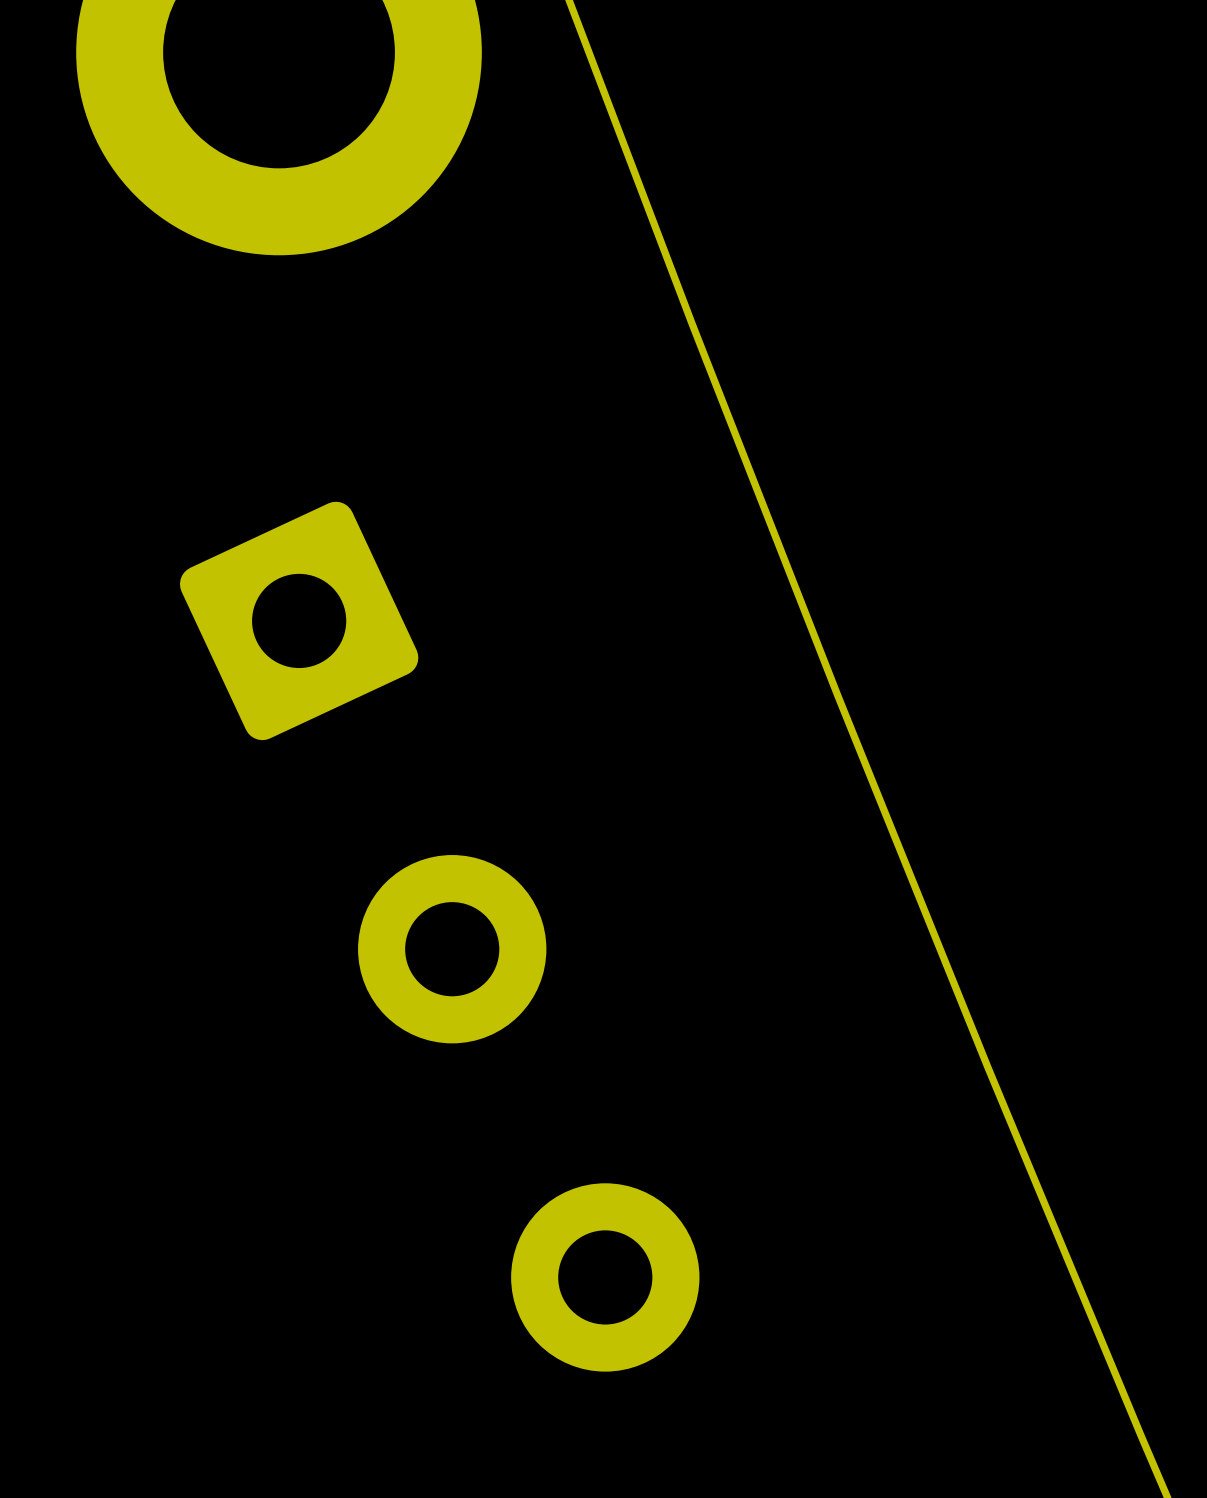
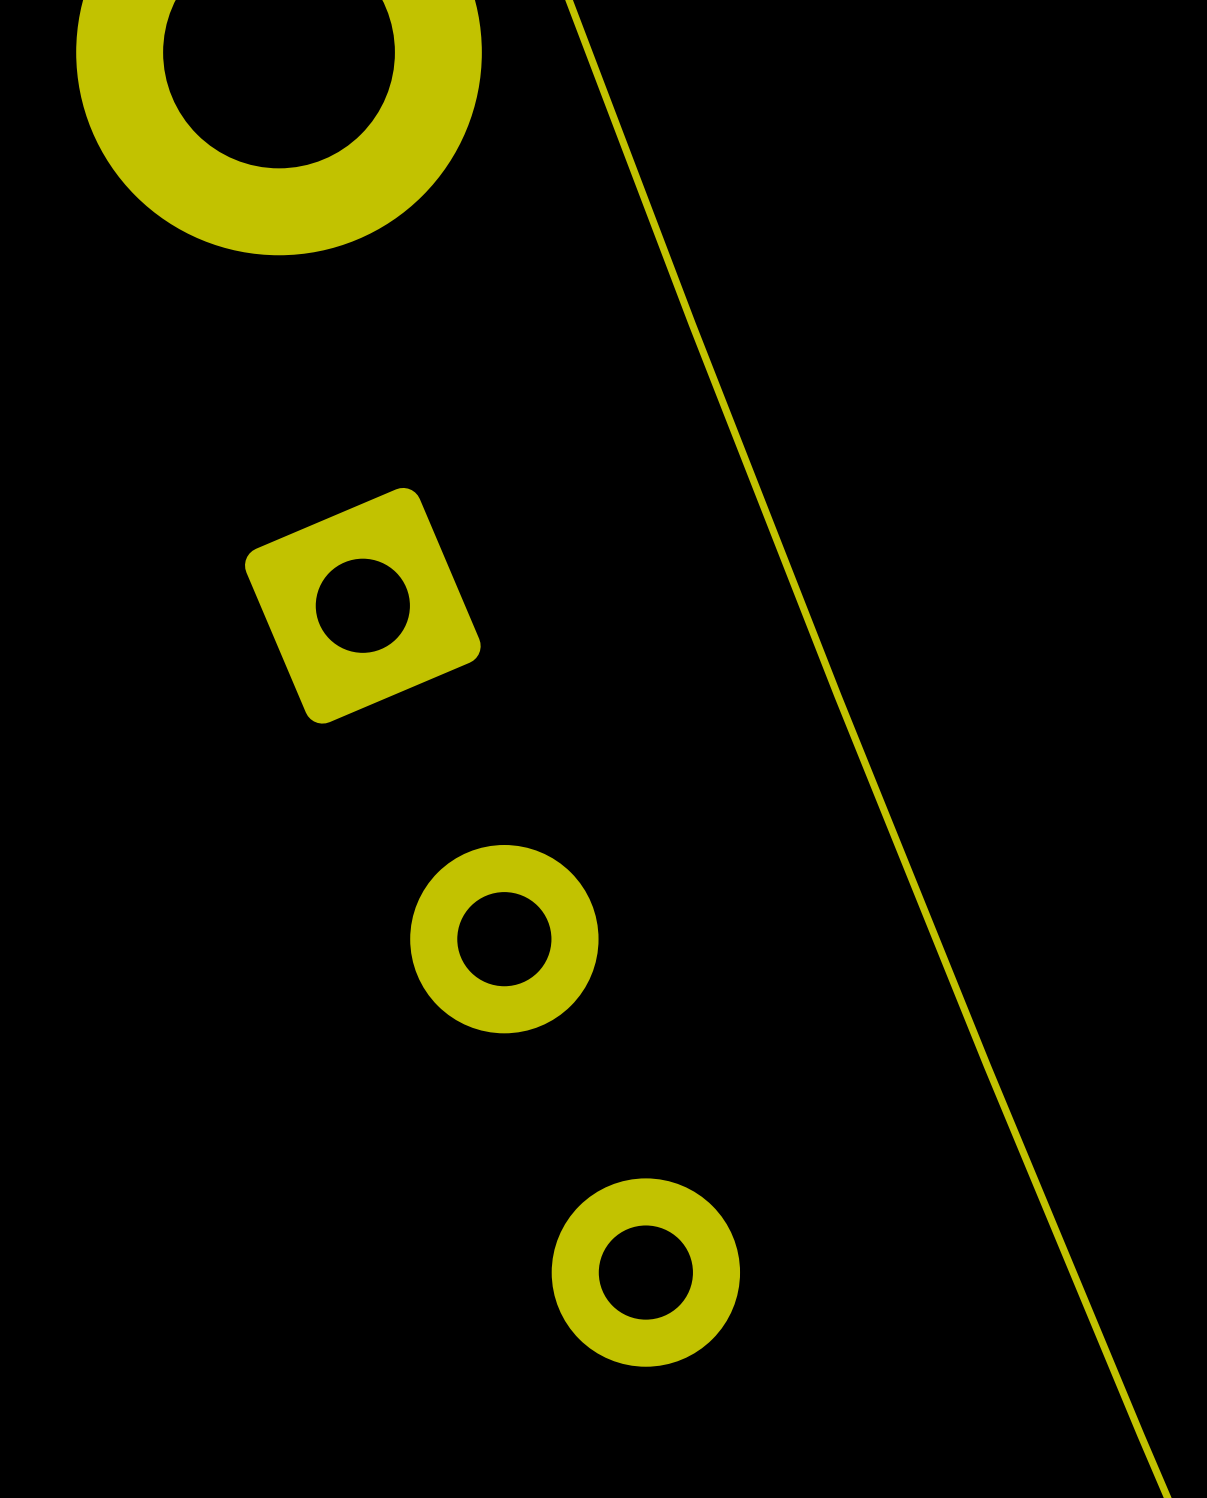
part rotation: 0° (439, 936) -> 2° clockwise (492, 927)

